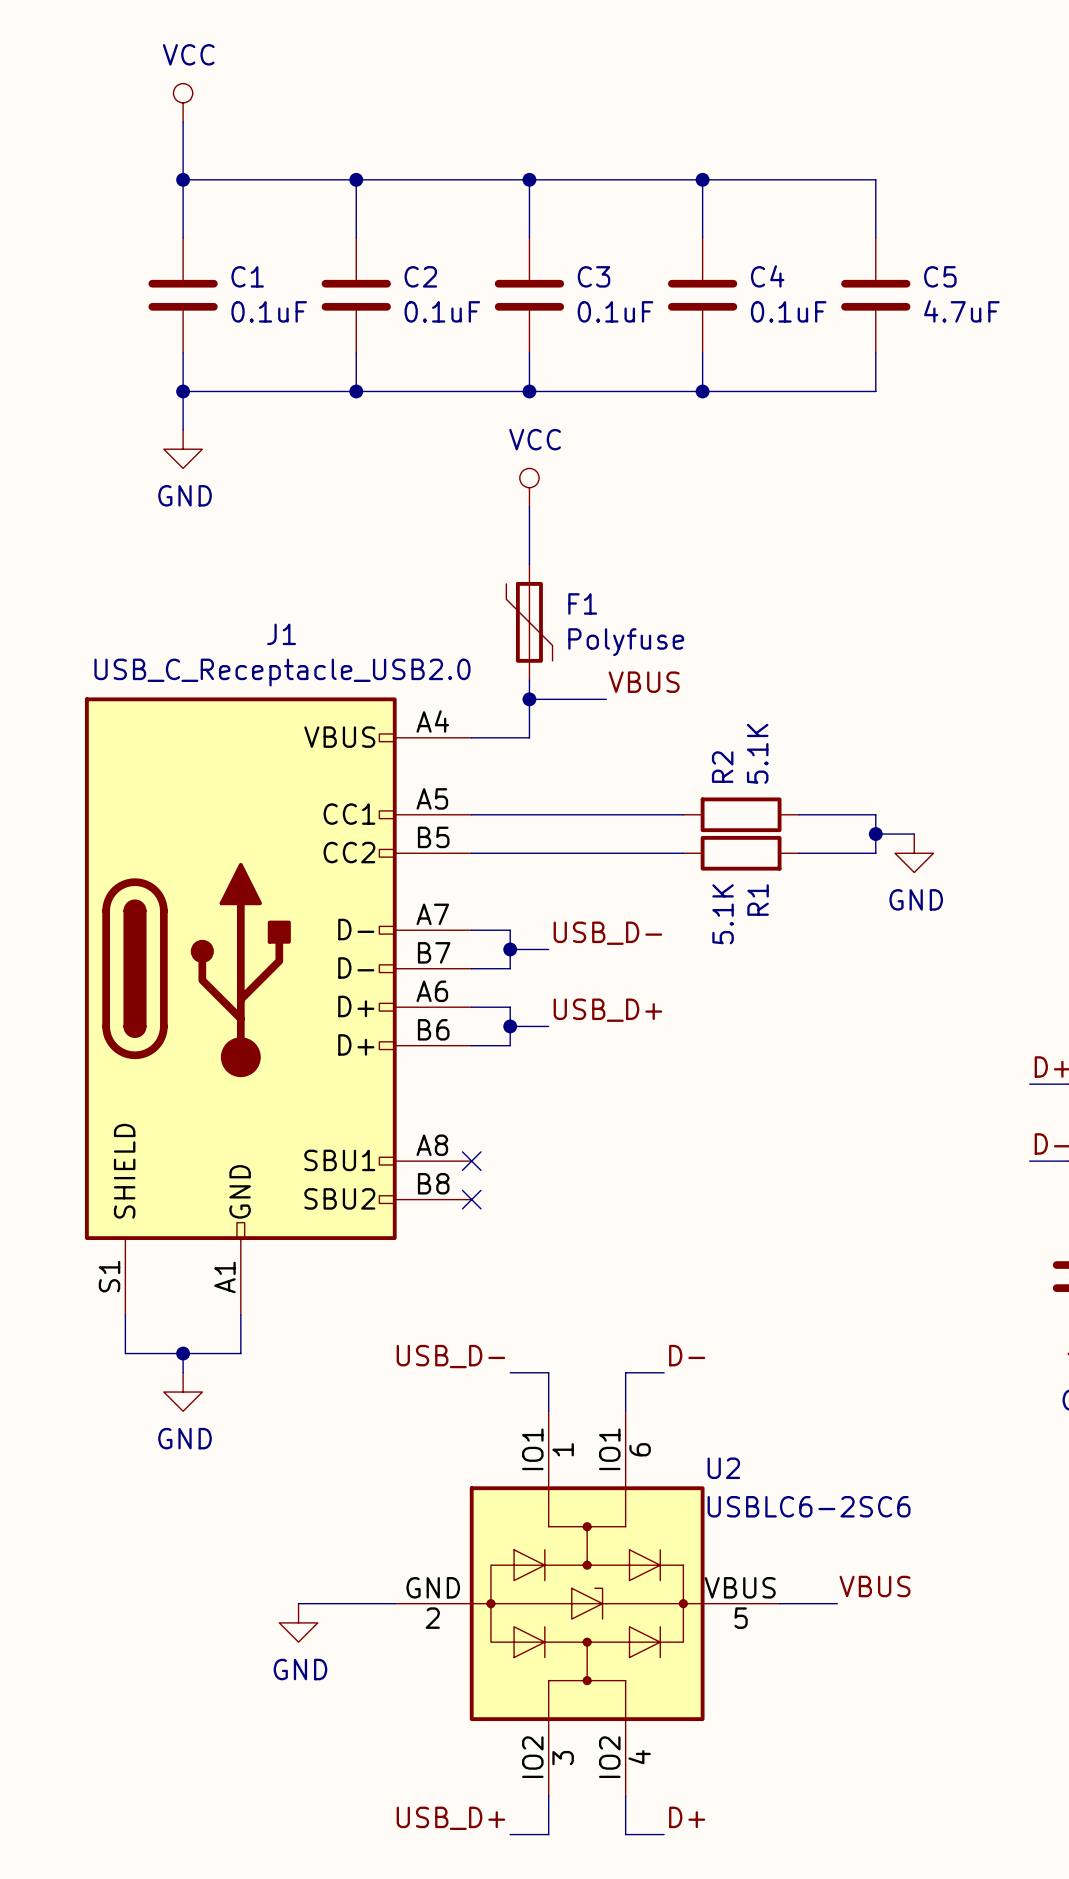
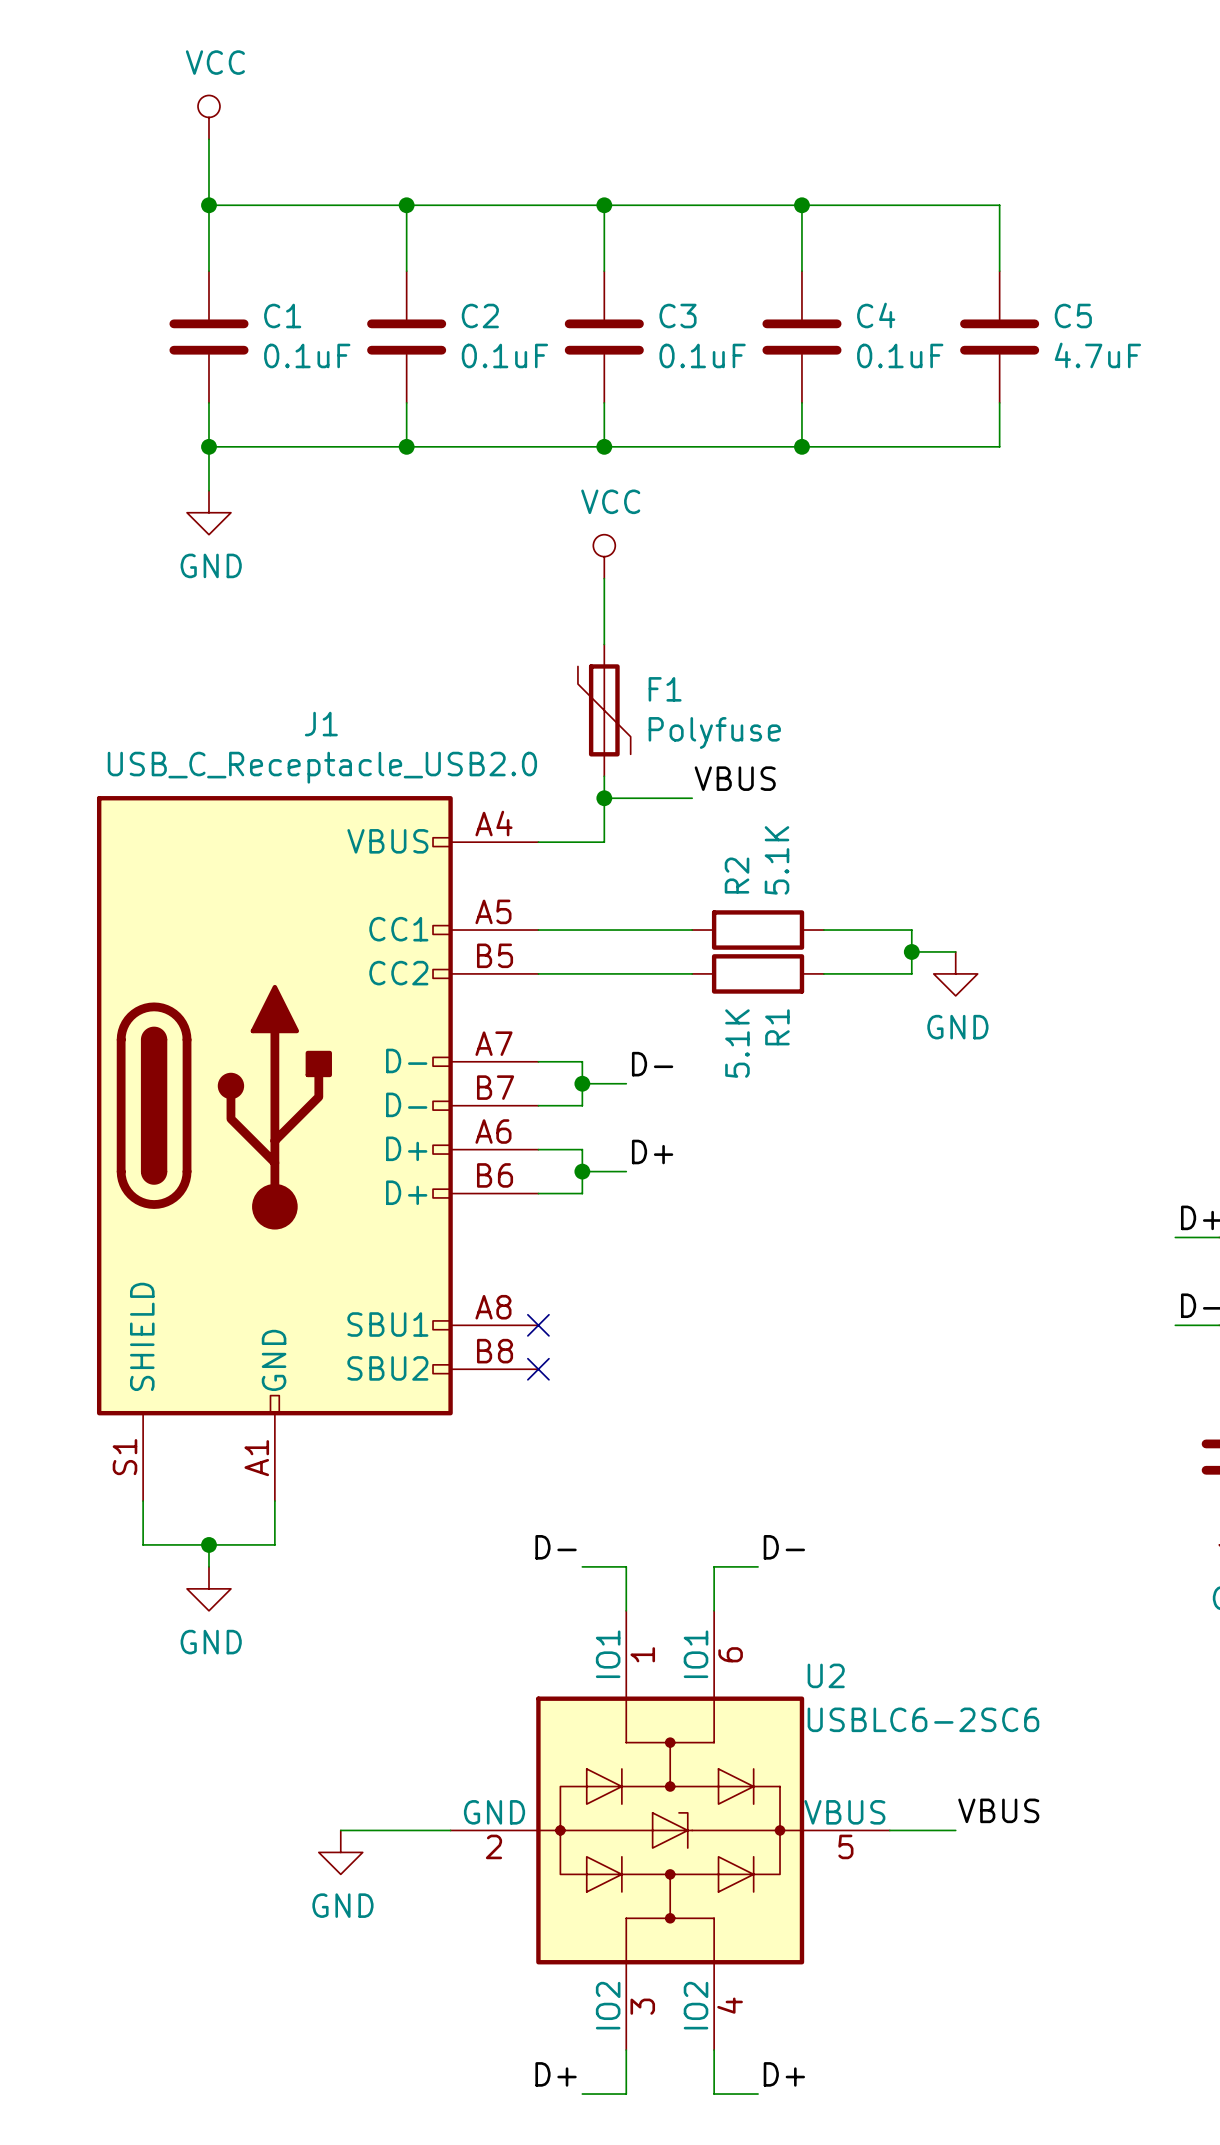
wire: (606, 814) (683, 814) -> none
R2 position: (741, 814) -> (758, 930)
wire: (798, 814) (875, 814) (875, 853) (798, 853) -> (823, 930) (911, 930) (911, 973) (823, 973)
wire: (875, 834) (914, 834) -> (911, 951) (955, 951)
junction position: (875, 834) -> (911, 951)
wire: (606, 853) (683, 853) -> none
R1 position: (741, 853) -> (758, 973)
power symbol position: GND (914, 853) -> GND (955, 973)
label: USB_D- (607, 933) -> D- (652, 1064)
label: USB_D+ (607, 1010) -> D+ (652, 1151)
label: USB_D- (450, 1356) -> D- (556, 1547)
label: USB_D+ (450, 1818) -> D+ (556, 2074)

